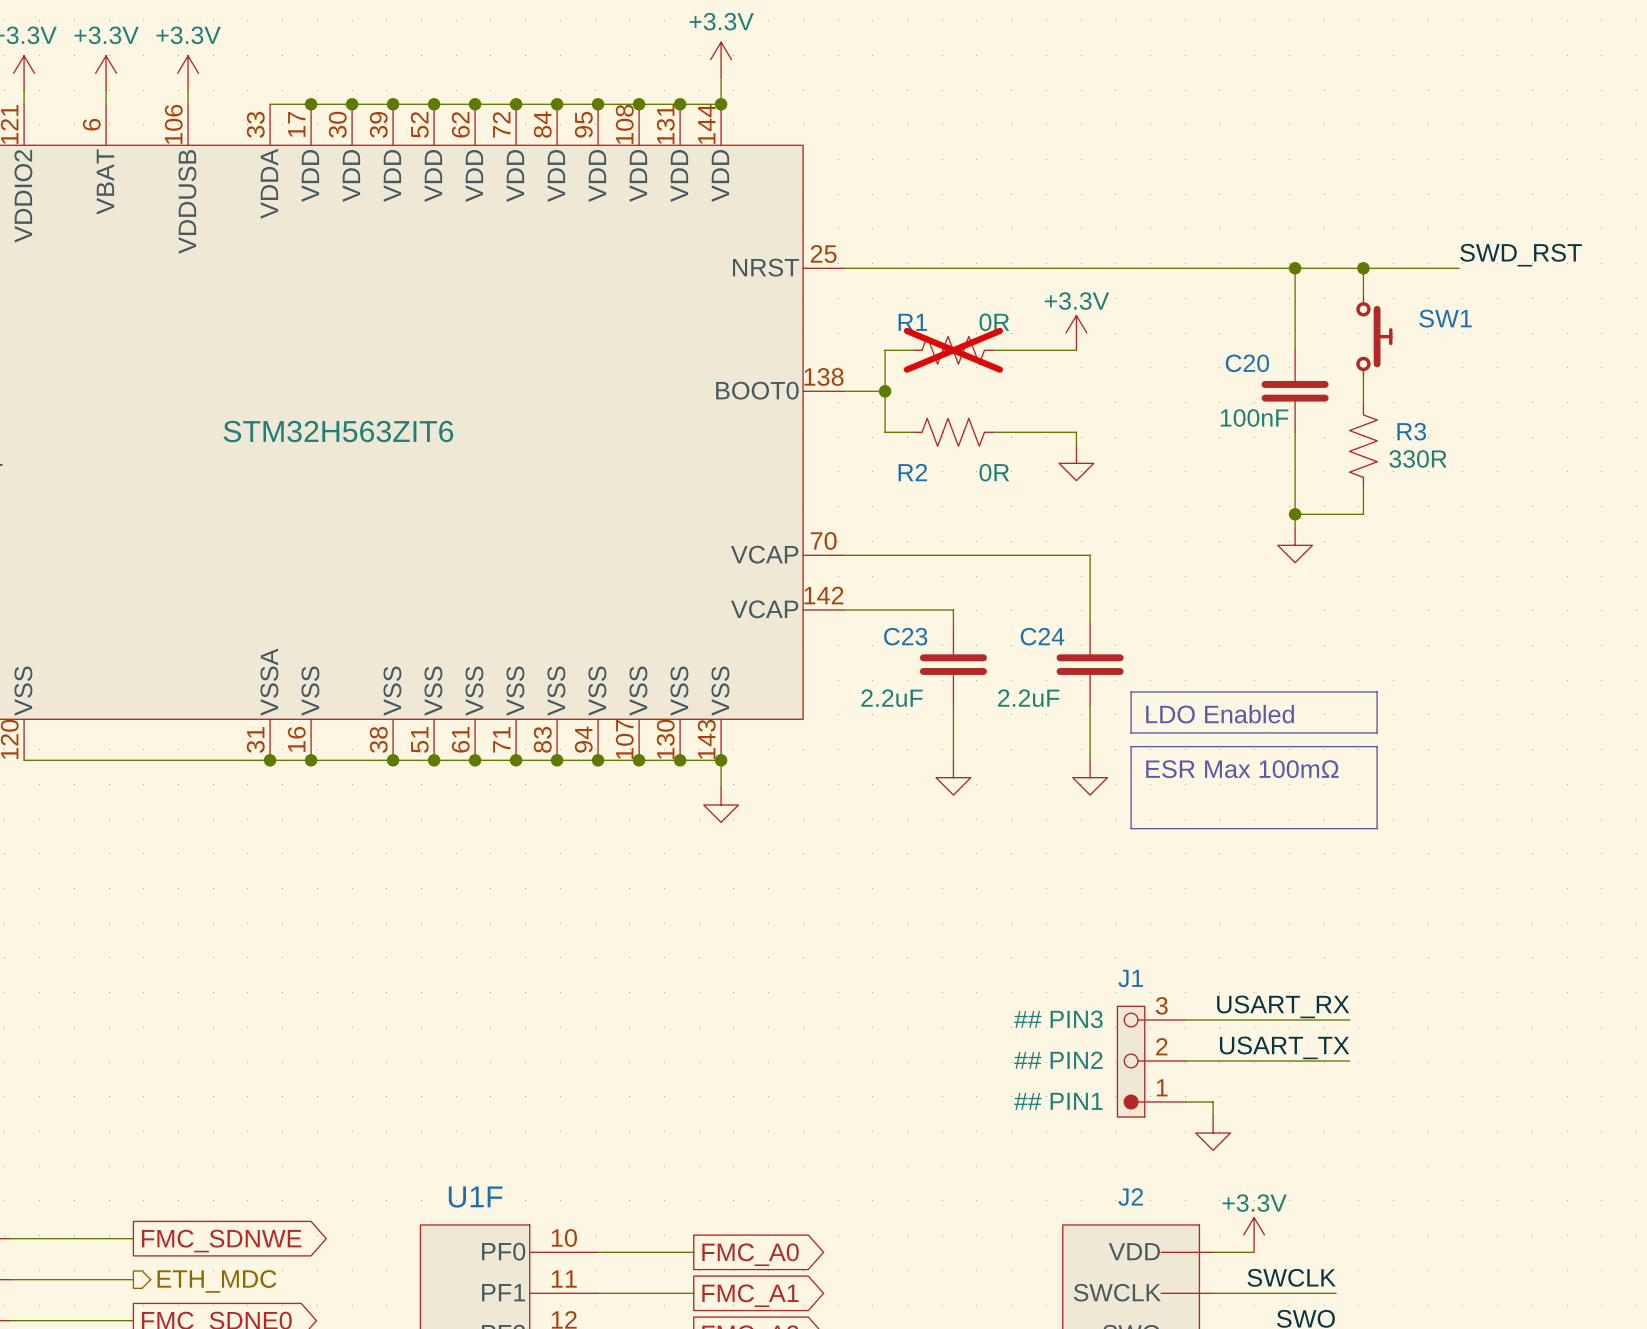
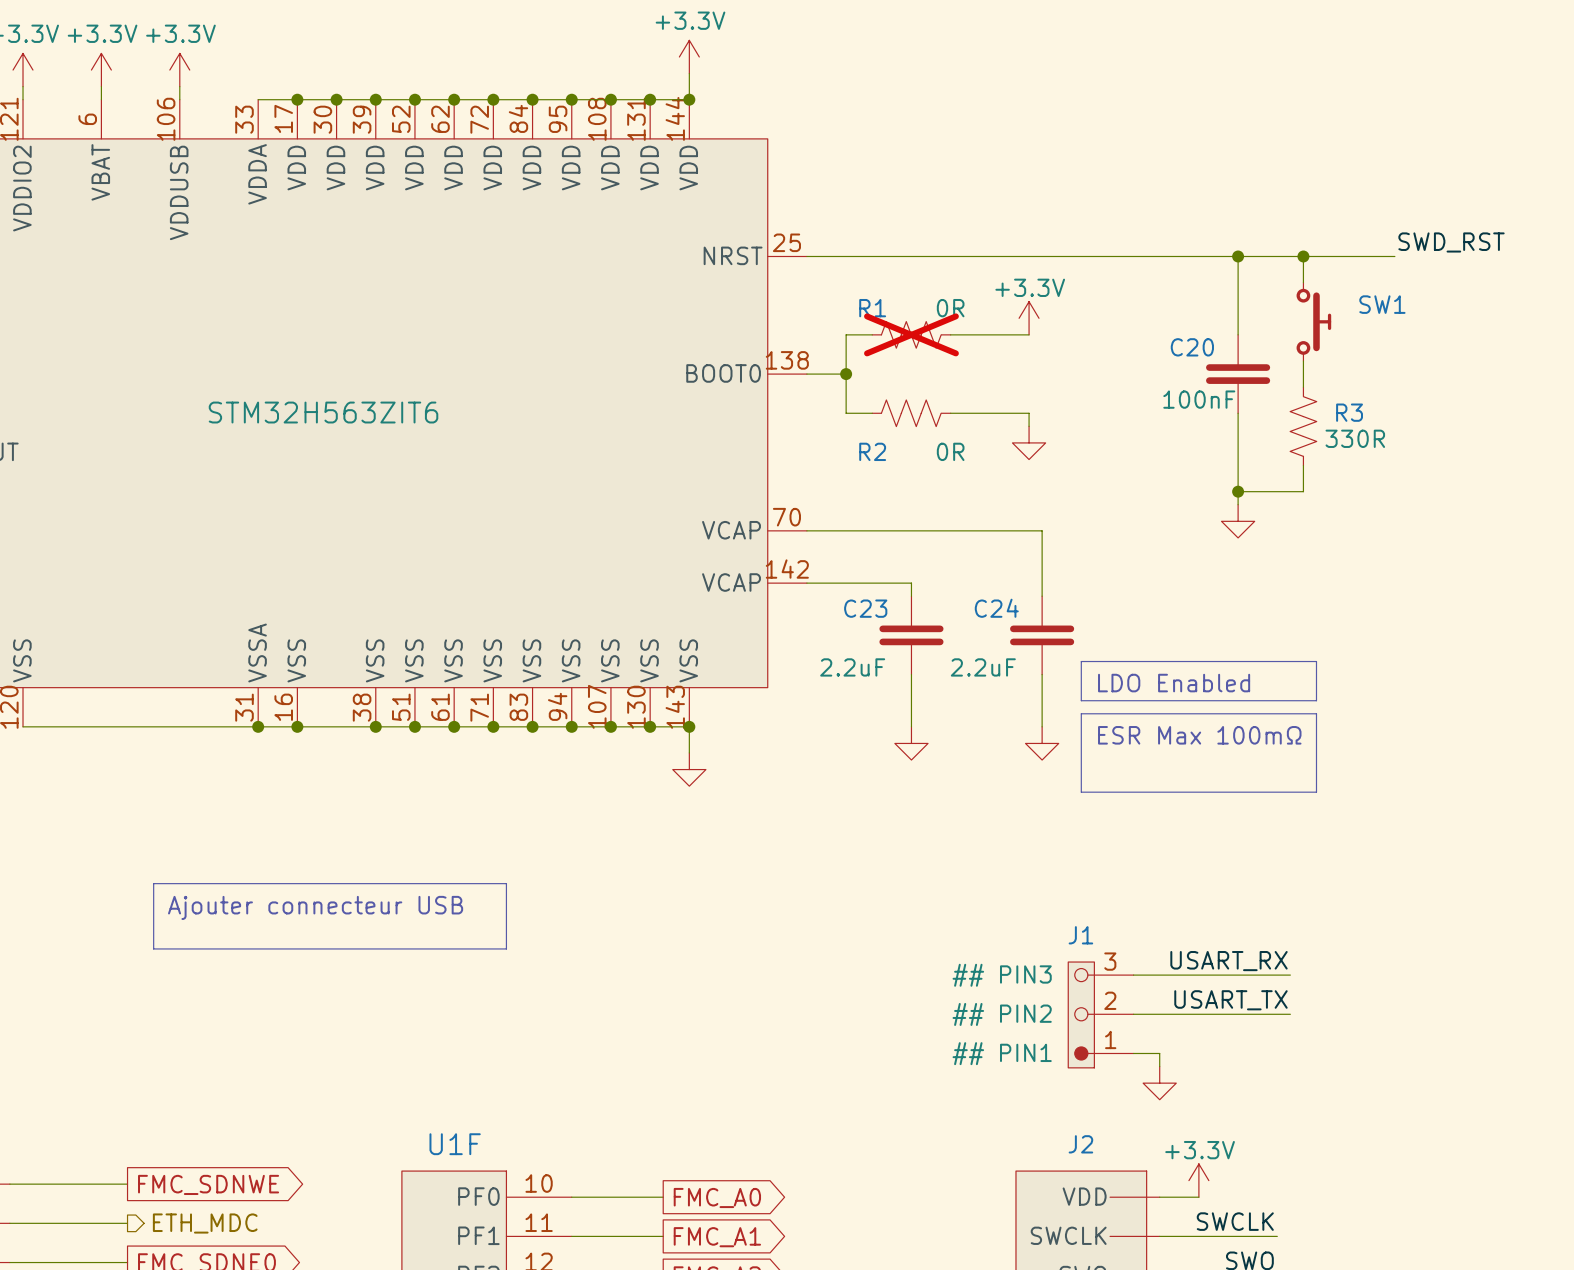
line: none -> (153, 883) (506, 883) (506, 948) (153, 948) (153, 883)
text: none -> Ajouter connecteur USB (315, 907)

